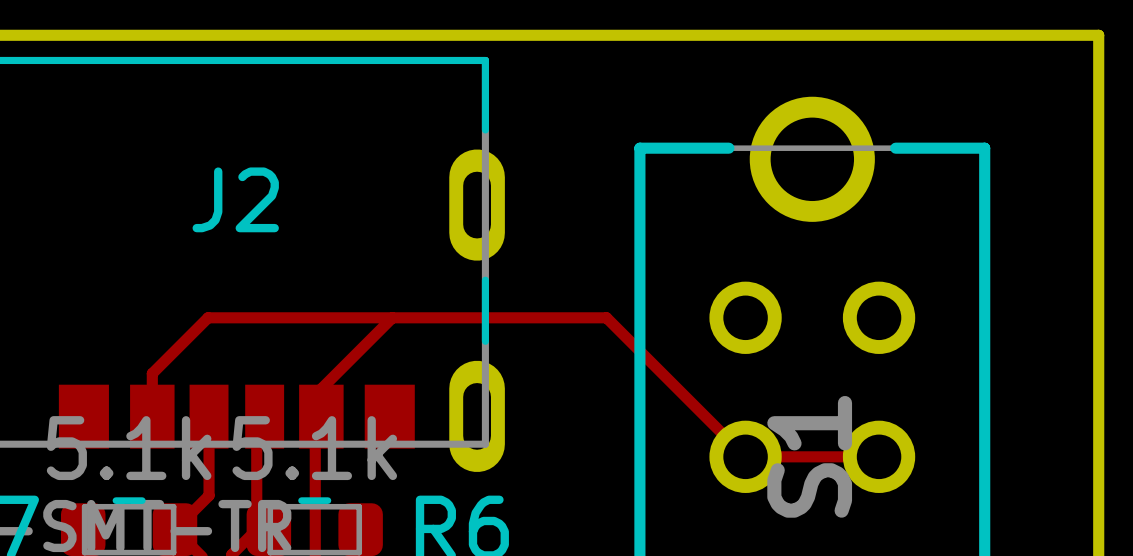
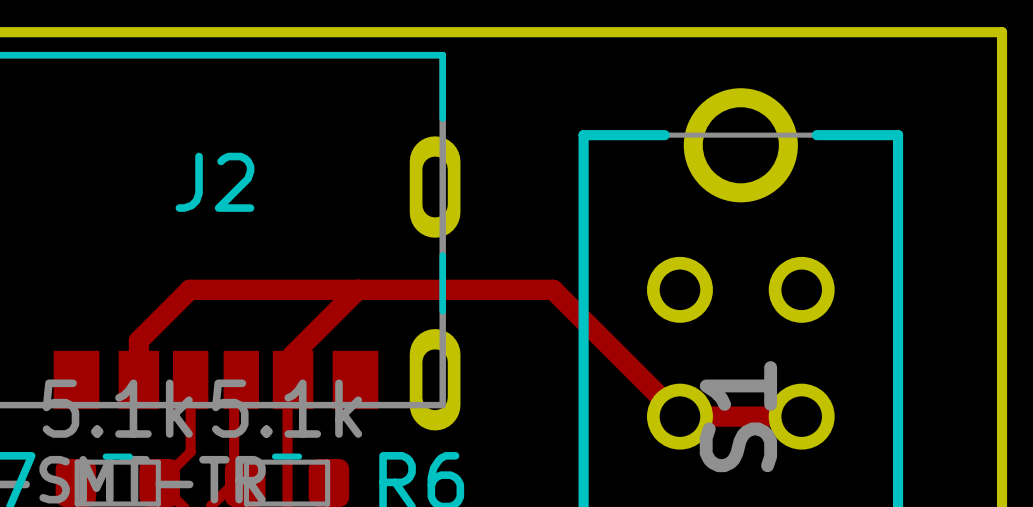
top track width: thin (392, 317) (321, 388) (321, 416) -> thick (357, 289) (293, 354) (293, 380)
top track width: thin (152, 416) (152, 373) (208, 317) (606, 317) (745, 456) (879, 456) -> thick (138, 380) (138, 340) (189, 289) (553, 289) (679, 416) (801, 416)

